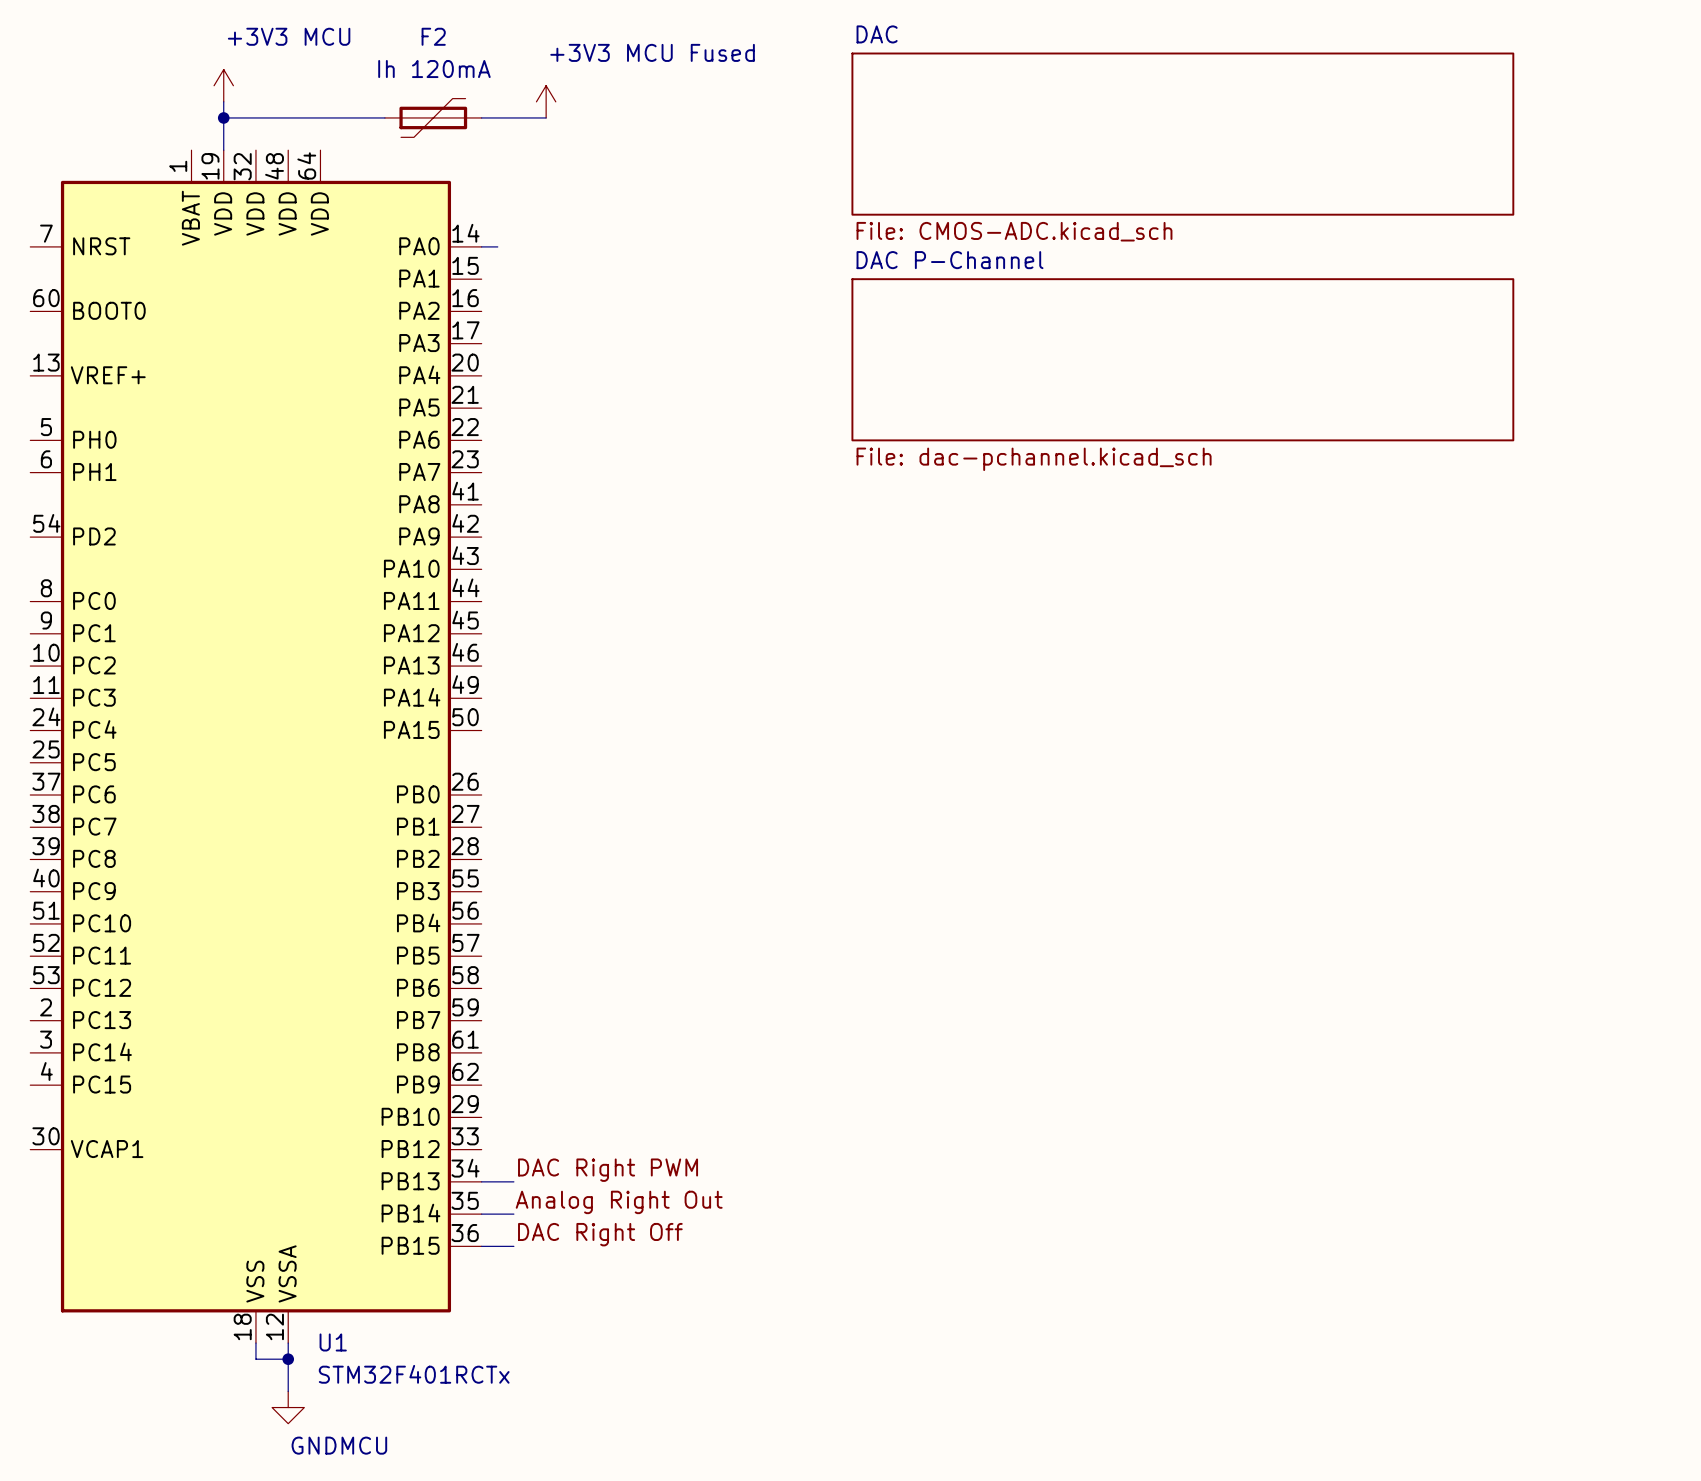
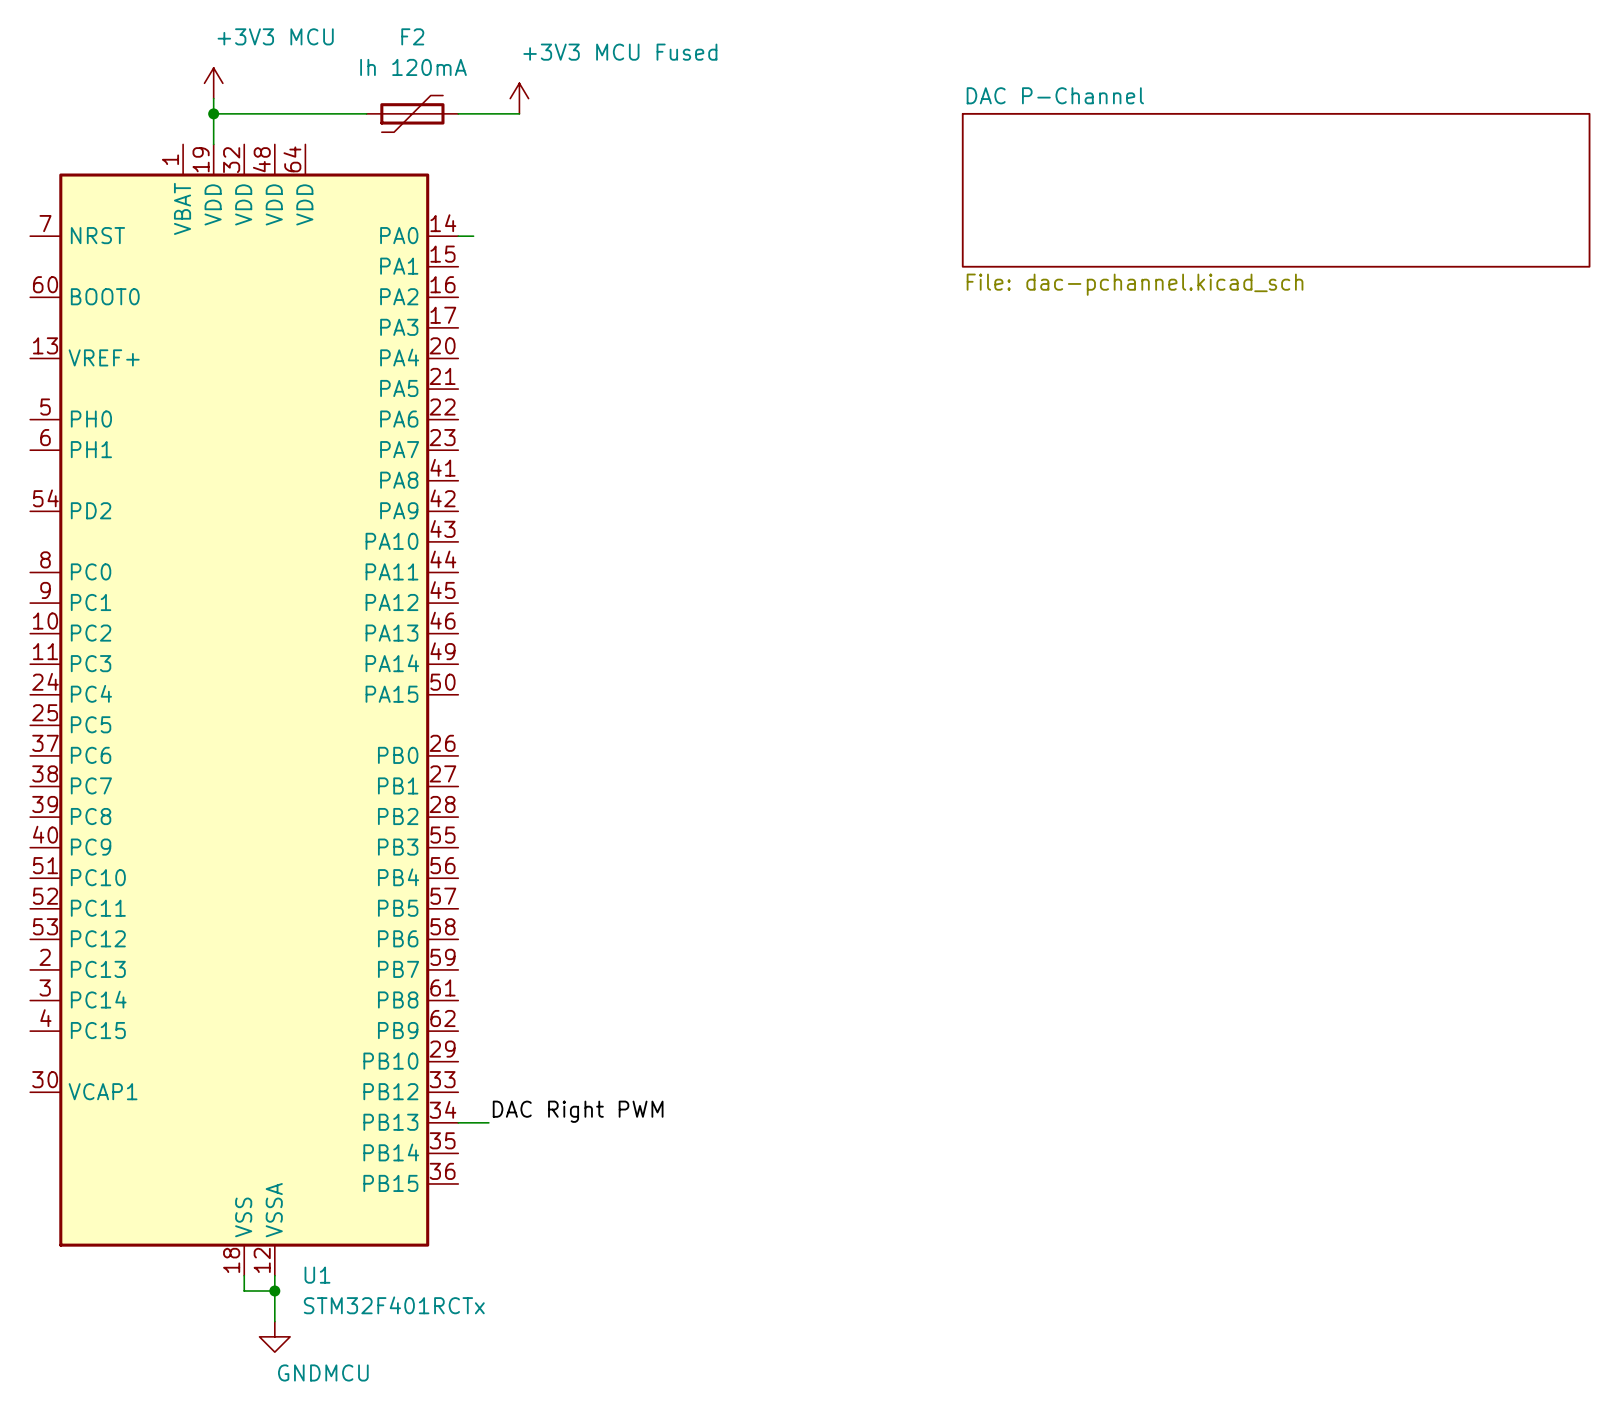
sheet DAC: File: CMOS-ADC.kicad_sch (1182, 134) -> none
sheet DAC P-Channel position: (1182, 359) -> (1276, 190)
label: Analog Right Out (619, 1202) -> none
wire: (481, 1214) (513, 1214) -> none
label: DAC Right Off (600, 1234) -> none
wire: (481, 1246) (513, 1246) -> none

